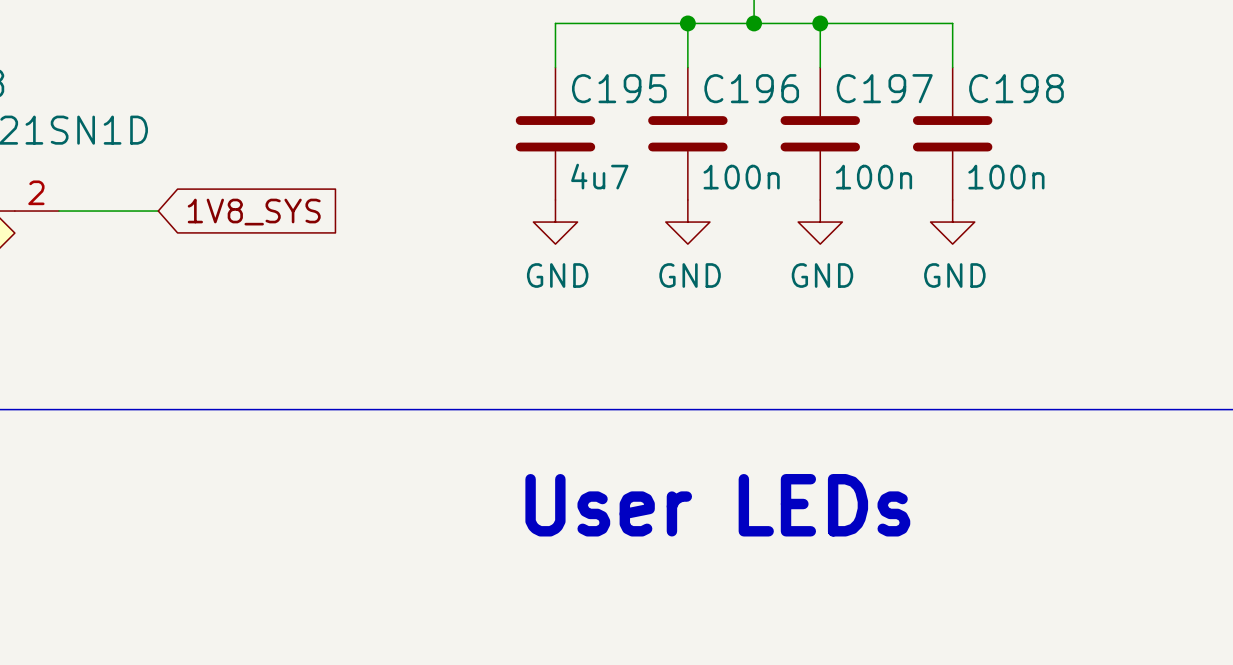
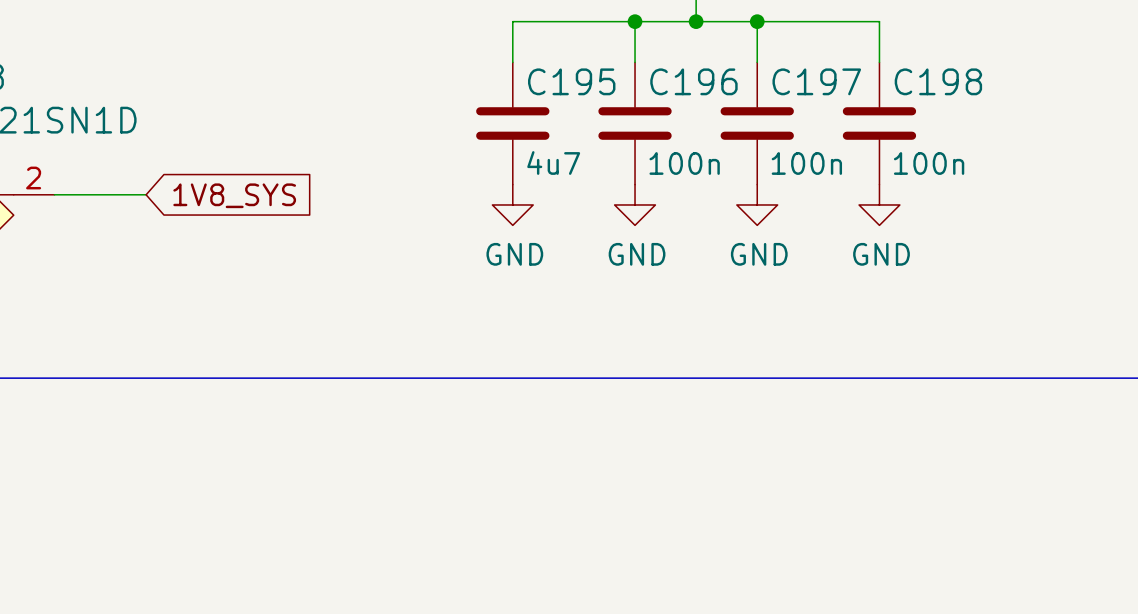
text: User LEDs (717, 505) -> none

